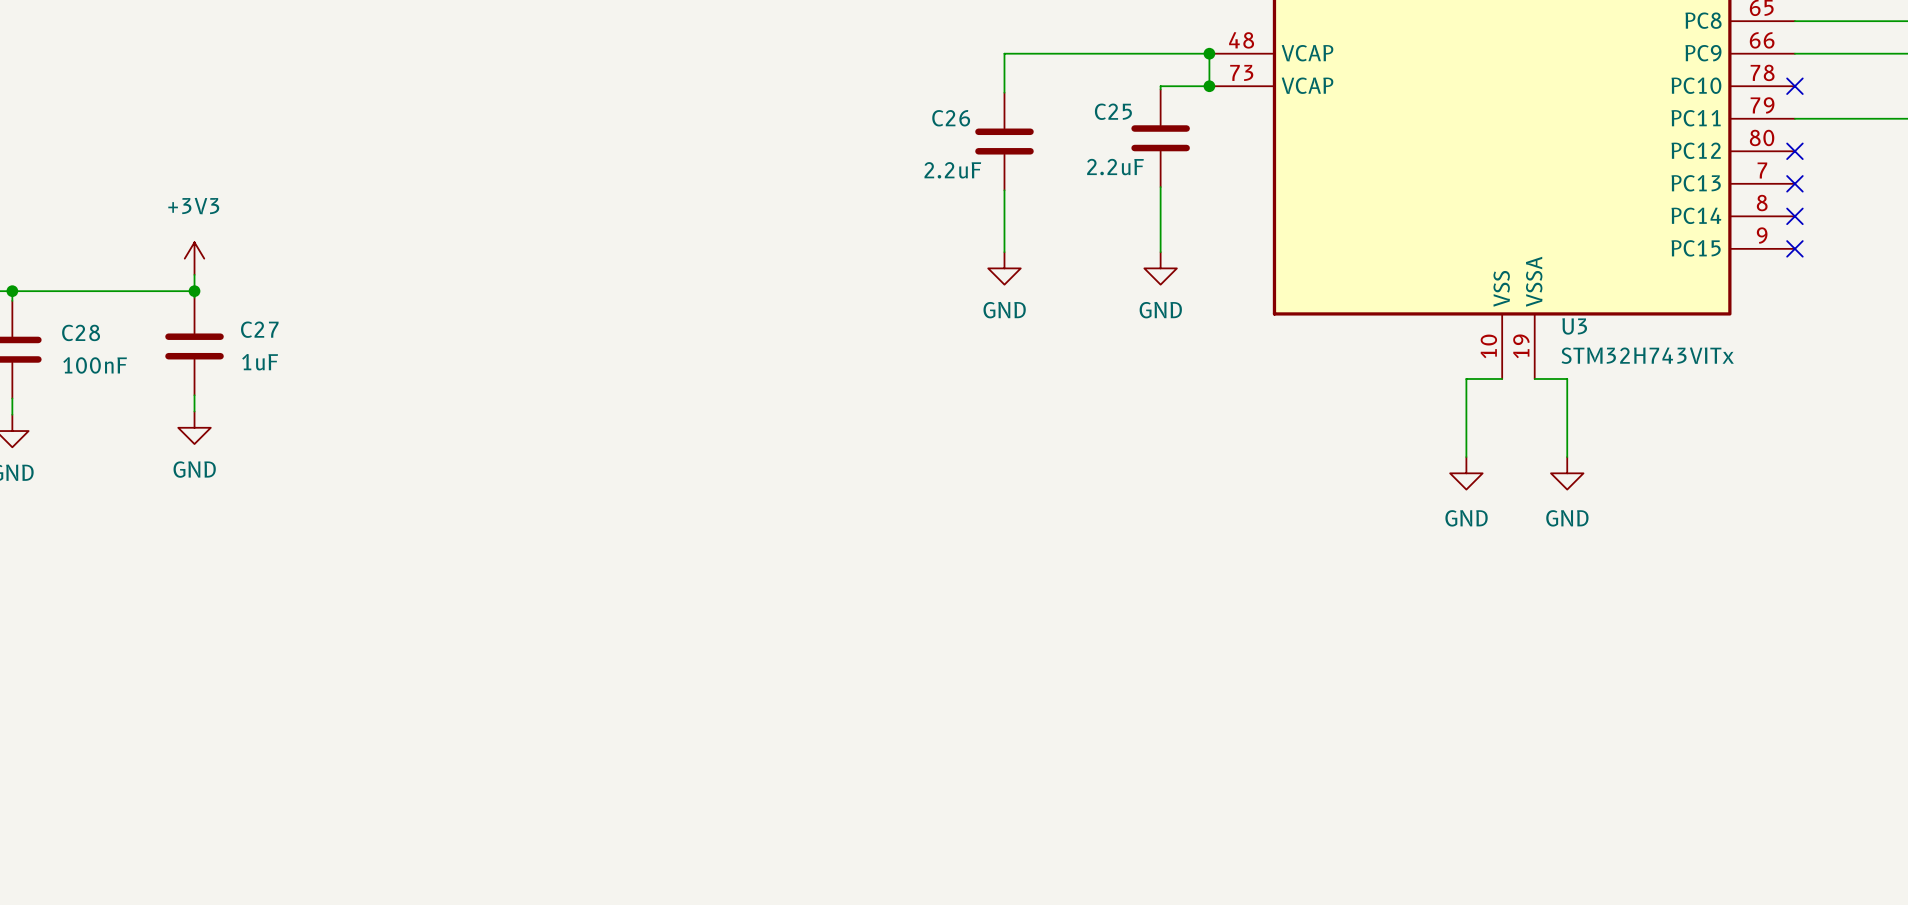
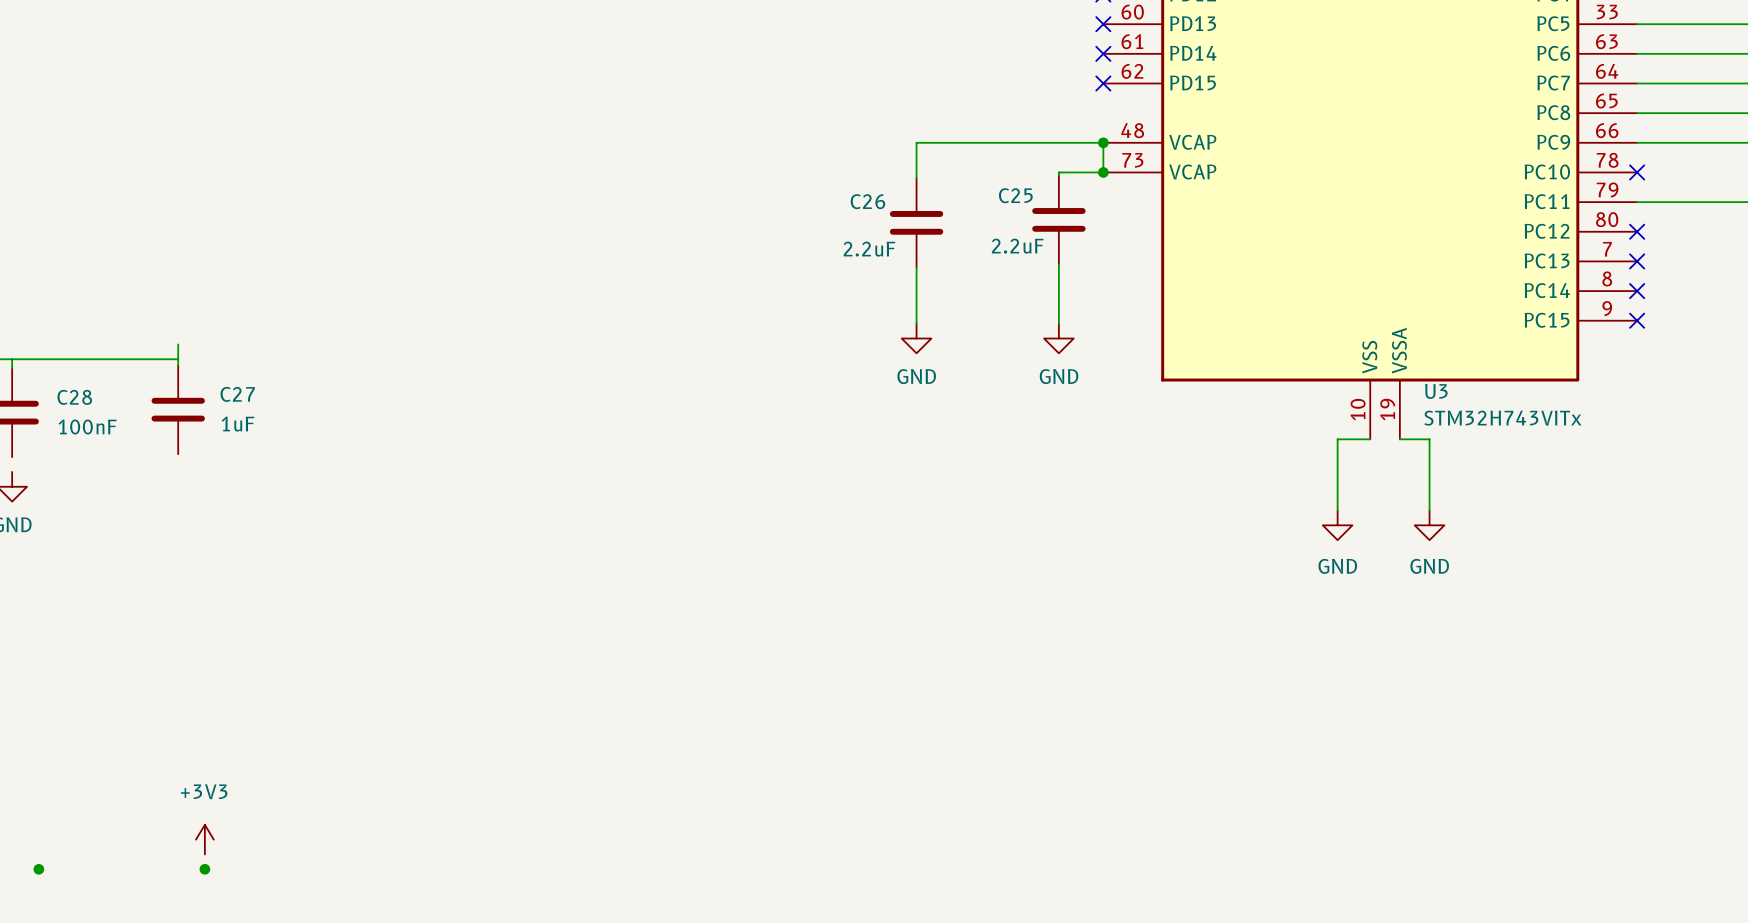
power symbol: +3V3 (194, 258) -> none
junction: (12, 291) -> none
junction: (194, 291) -> none
wire: (194, 395) (194, 411) -> none
wire: (12, 398) (12, 414) -> none
power symbol: GND (194, 427) -> none
power symbol: none -> +3V3 (204, 839)
junction: none -> (38, 869)
junction: none -> (204, 869)

